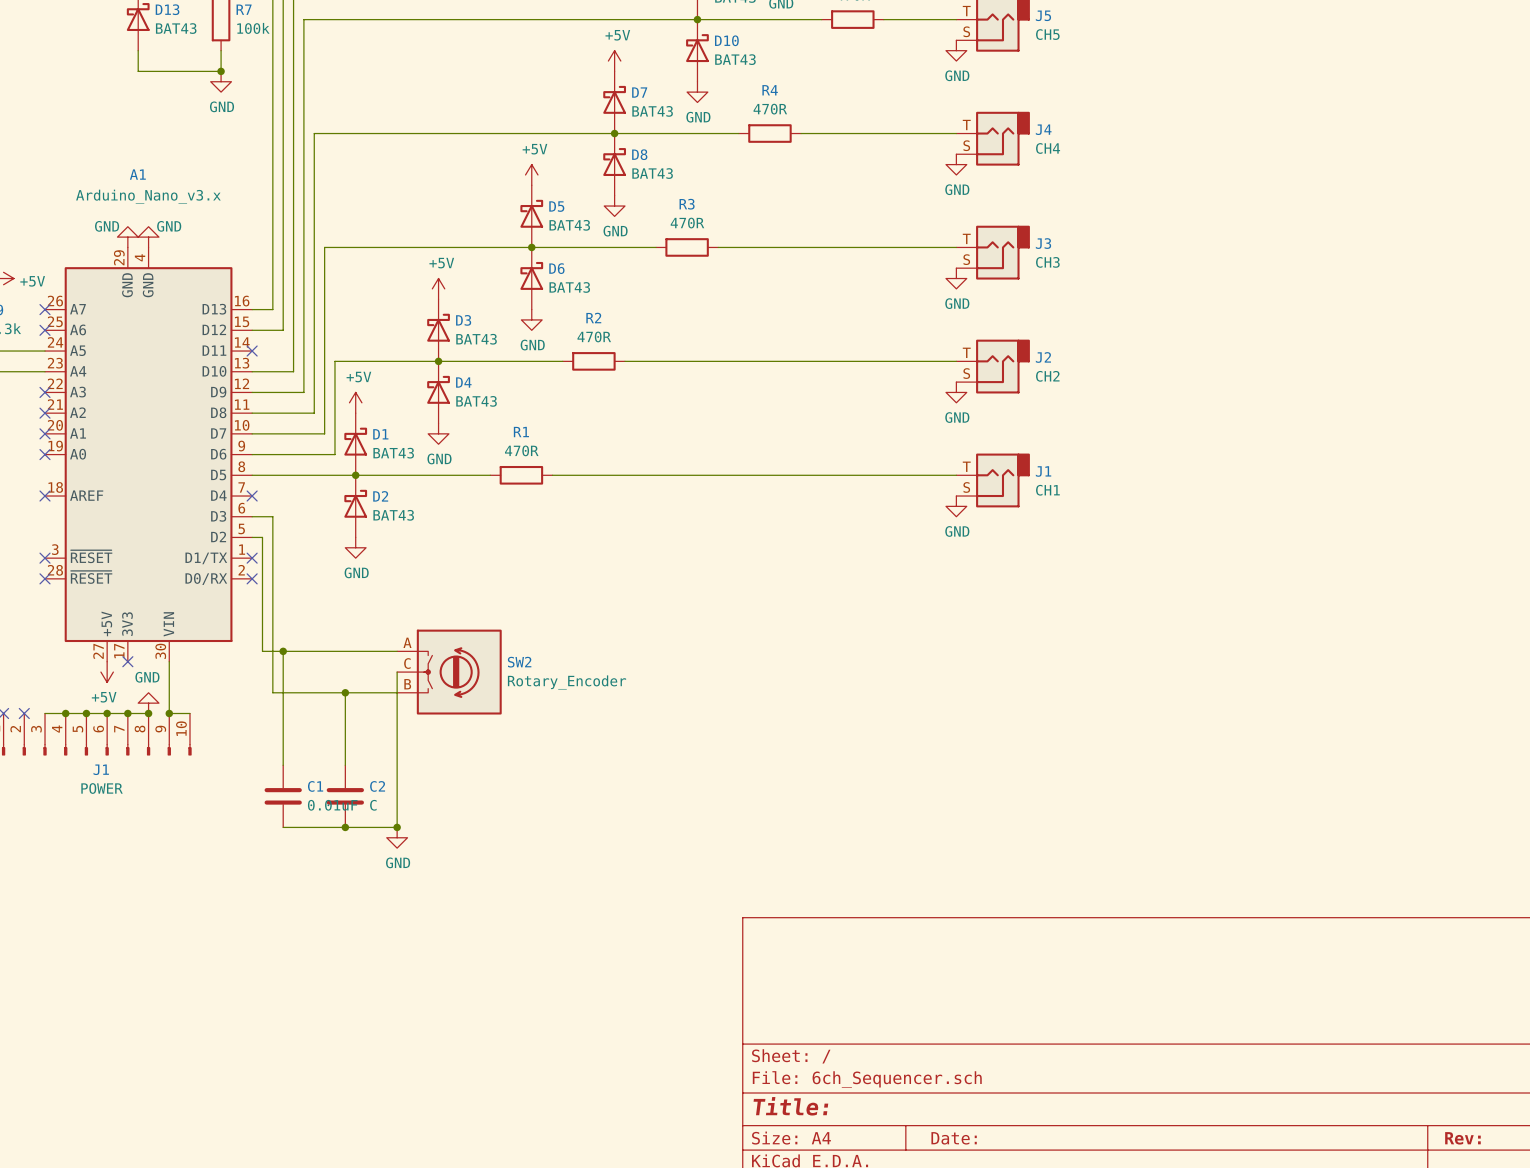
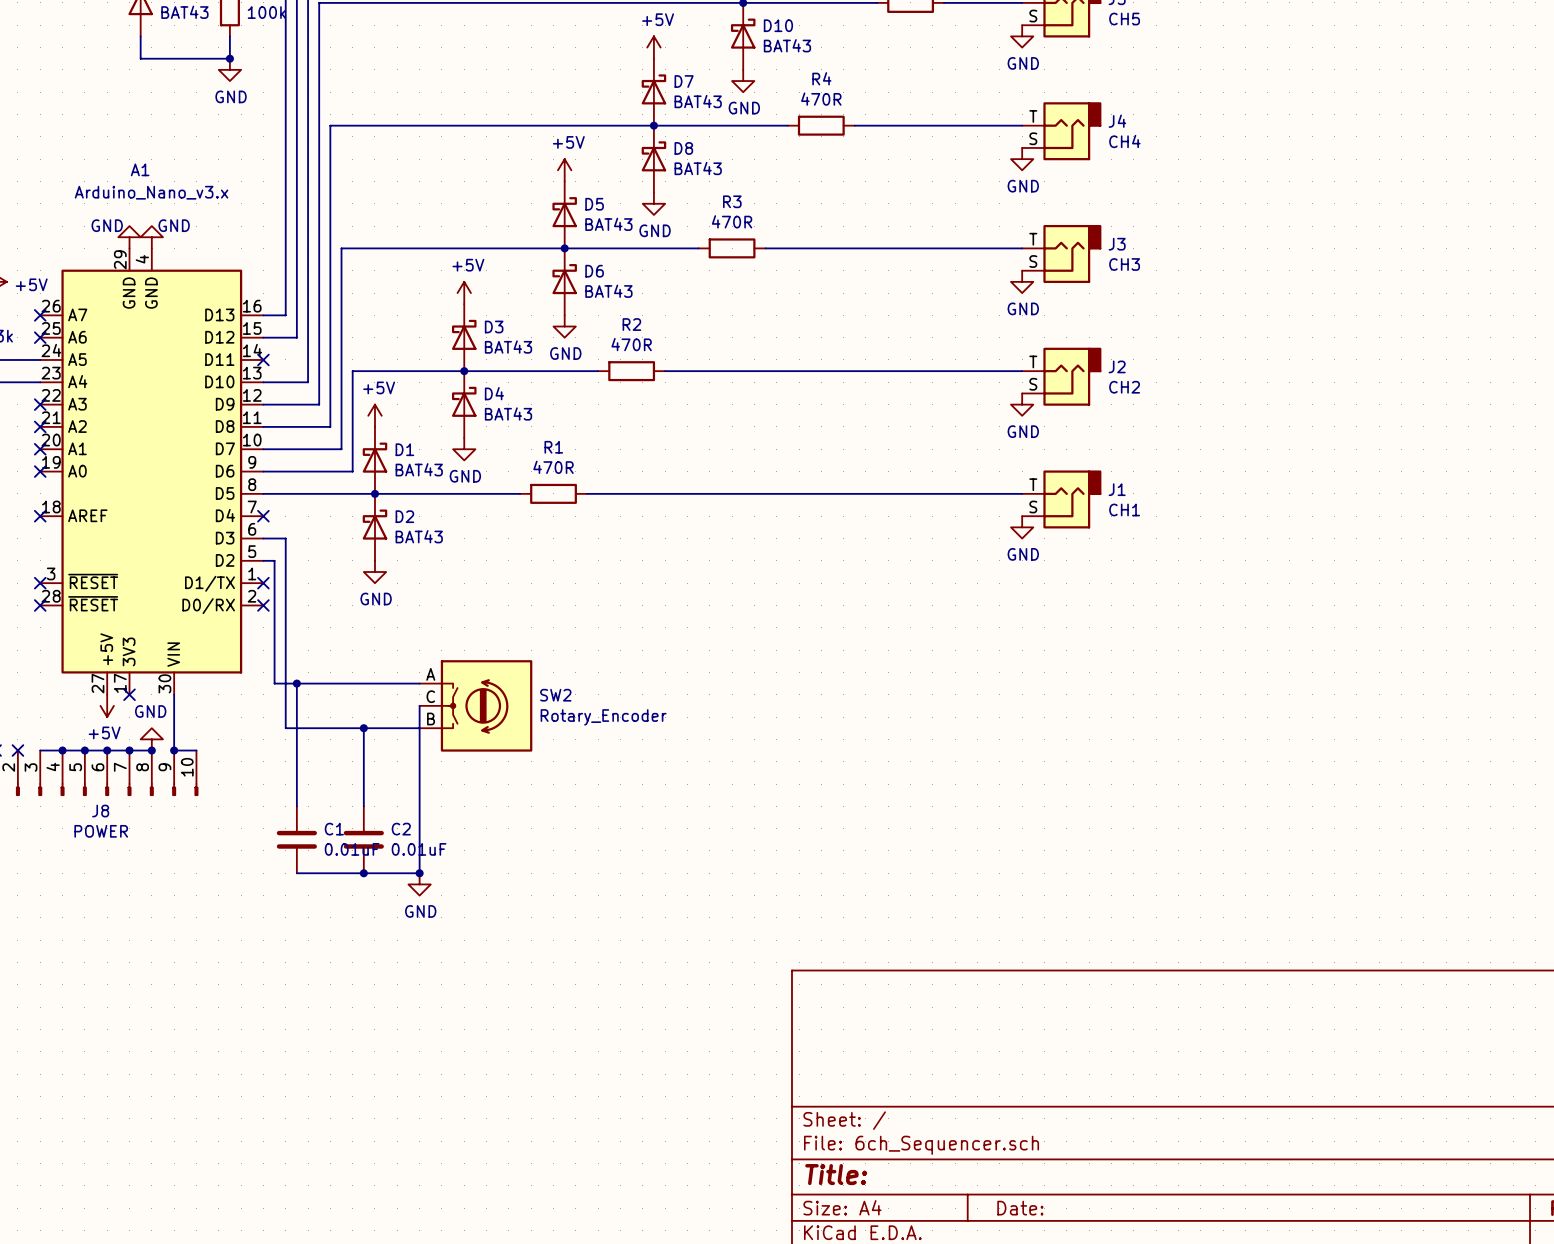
J1 name: J1 (101, 769) -> J8 (100, 811)
C2 value: C (373, 805) -> 0.01uF (419, 849)

